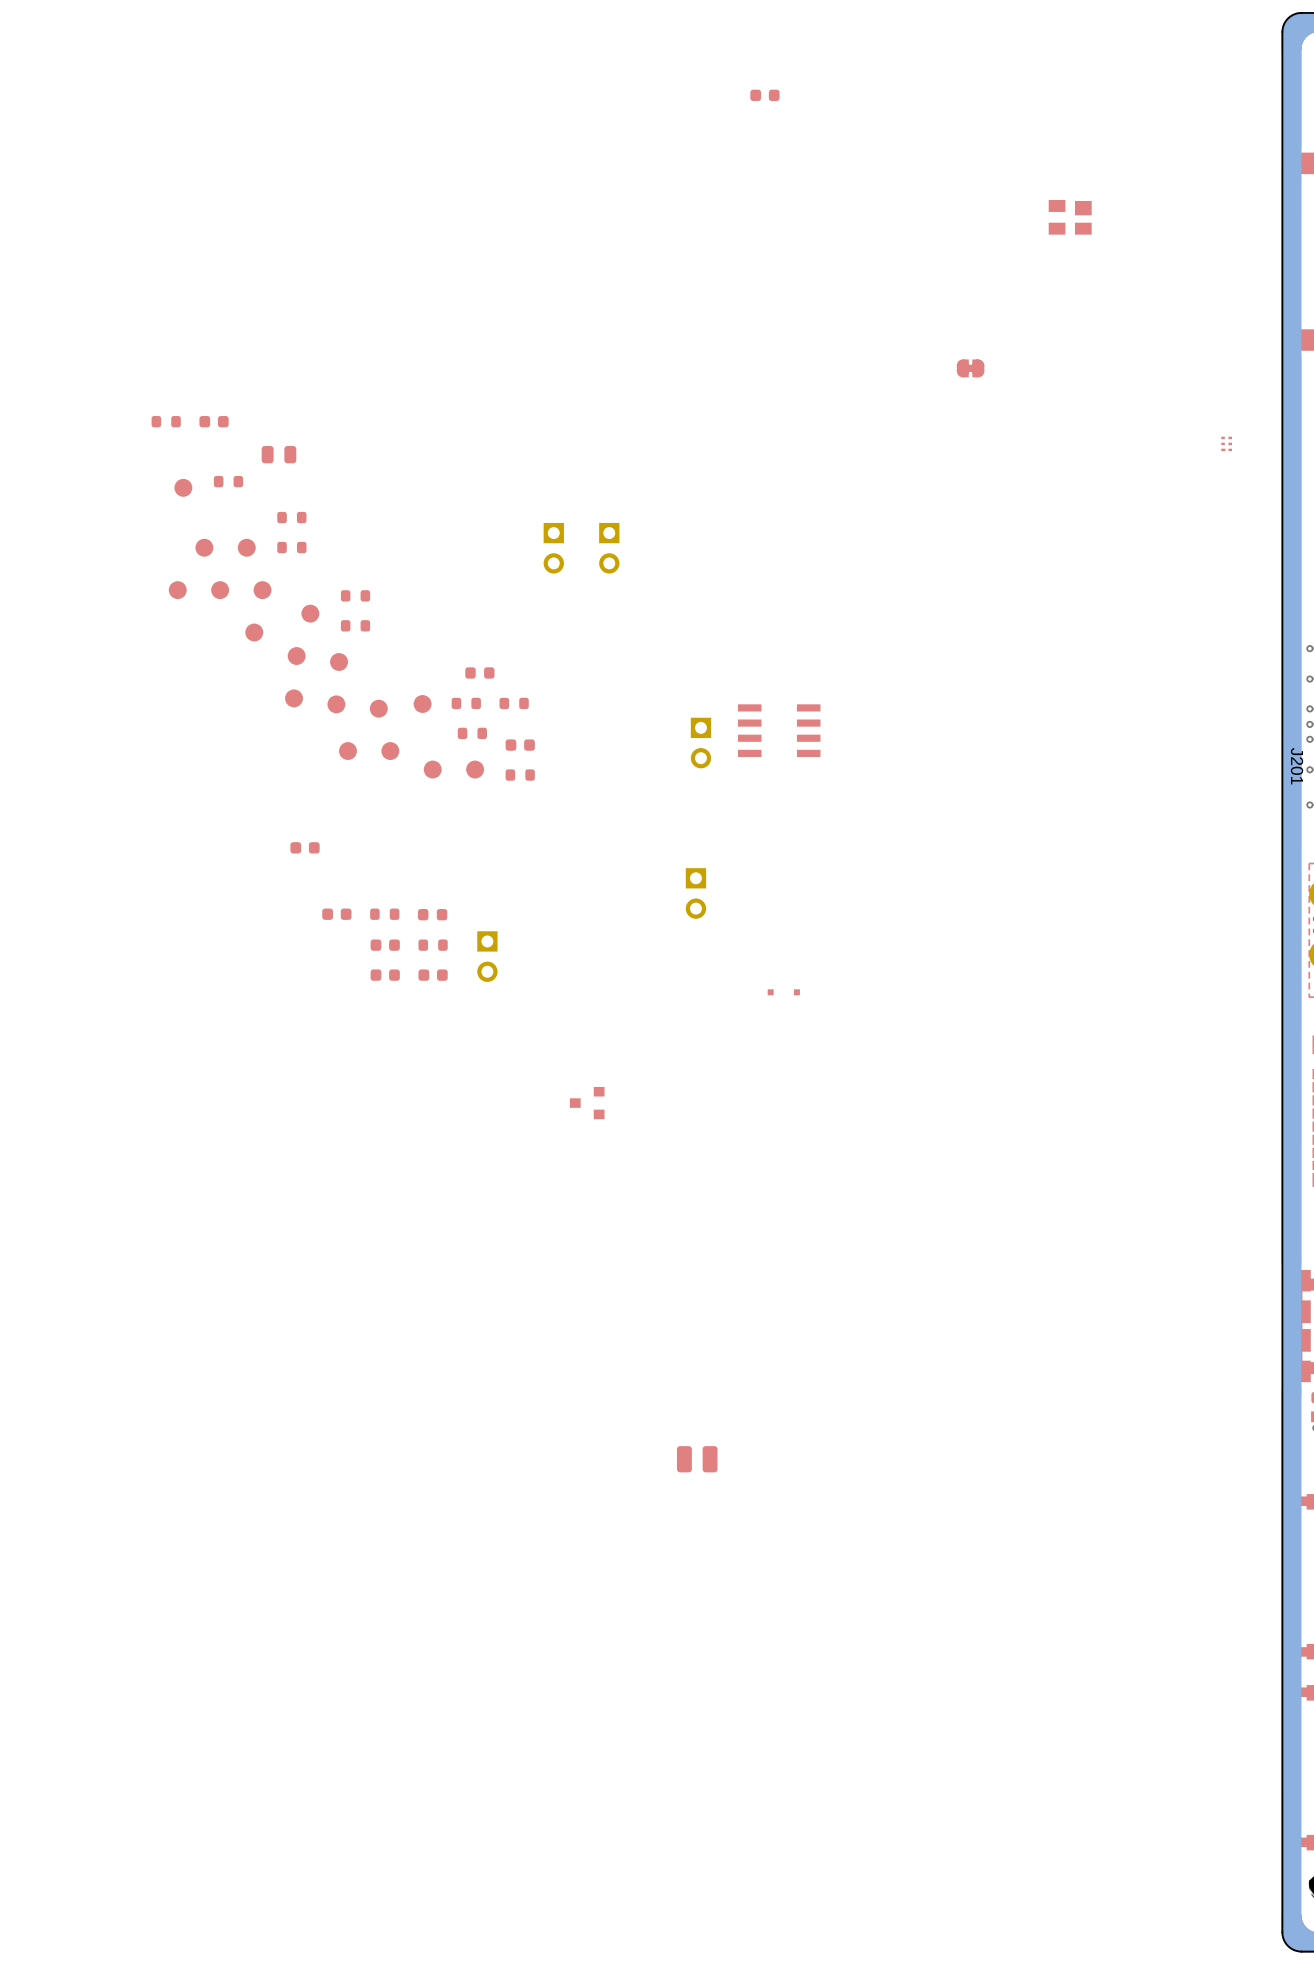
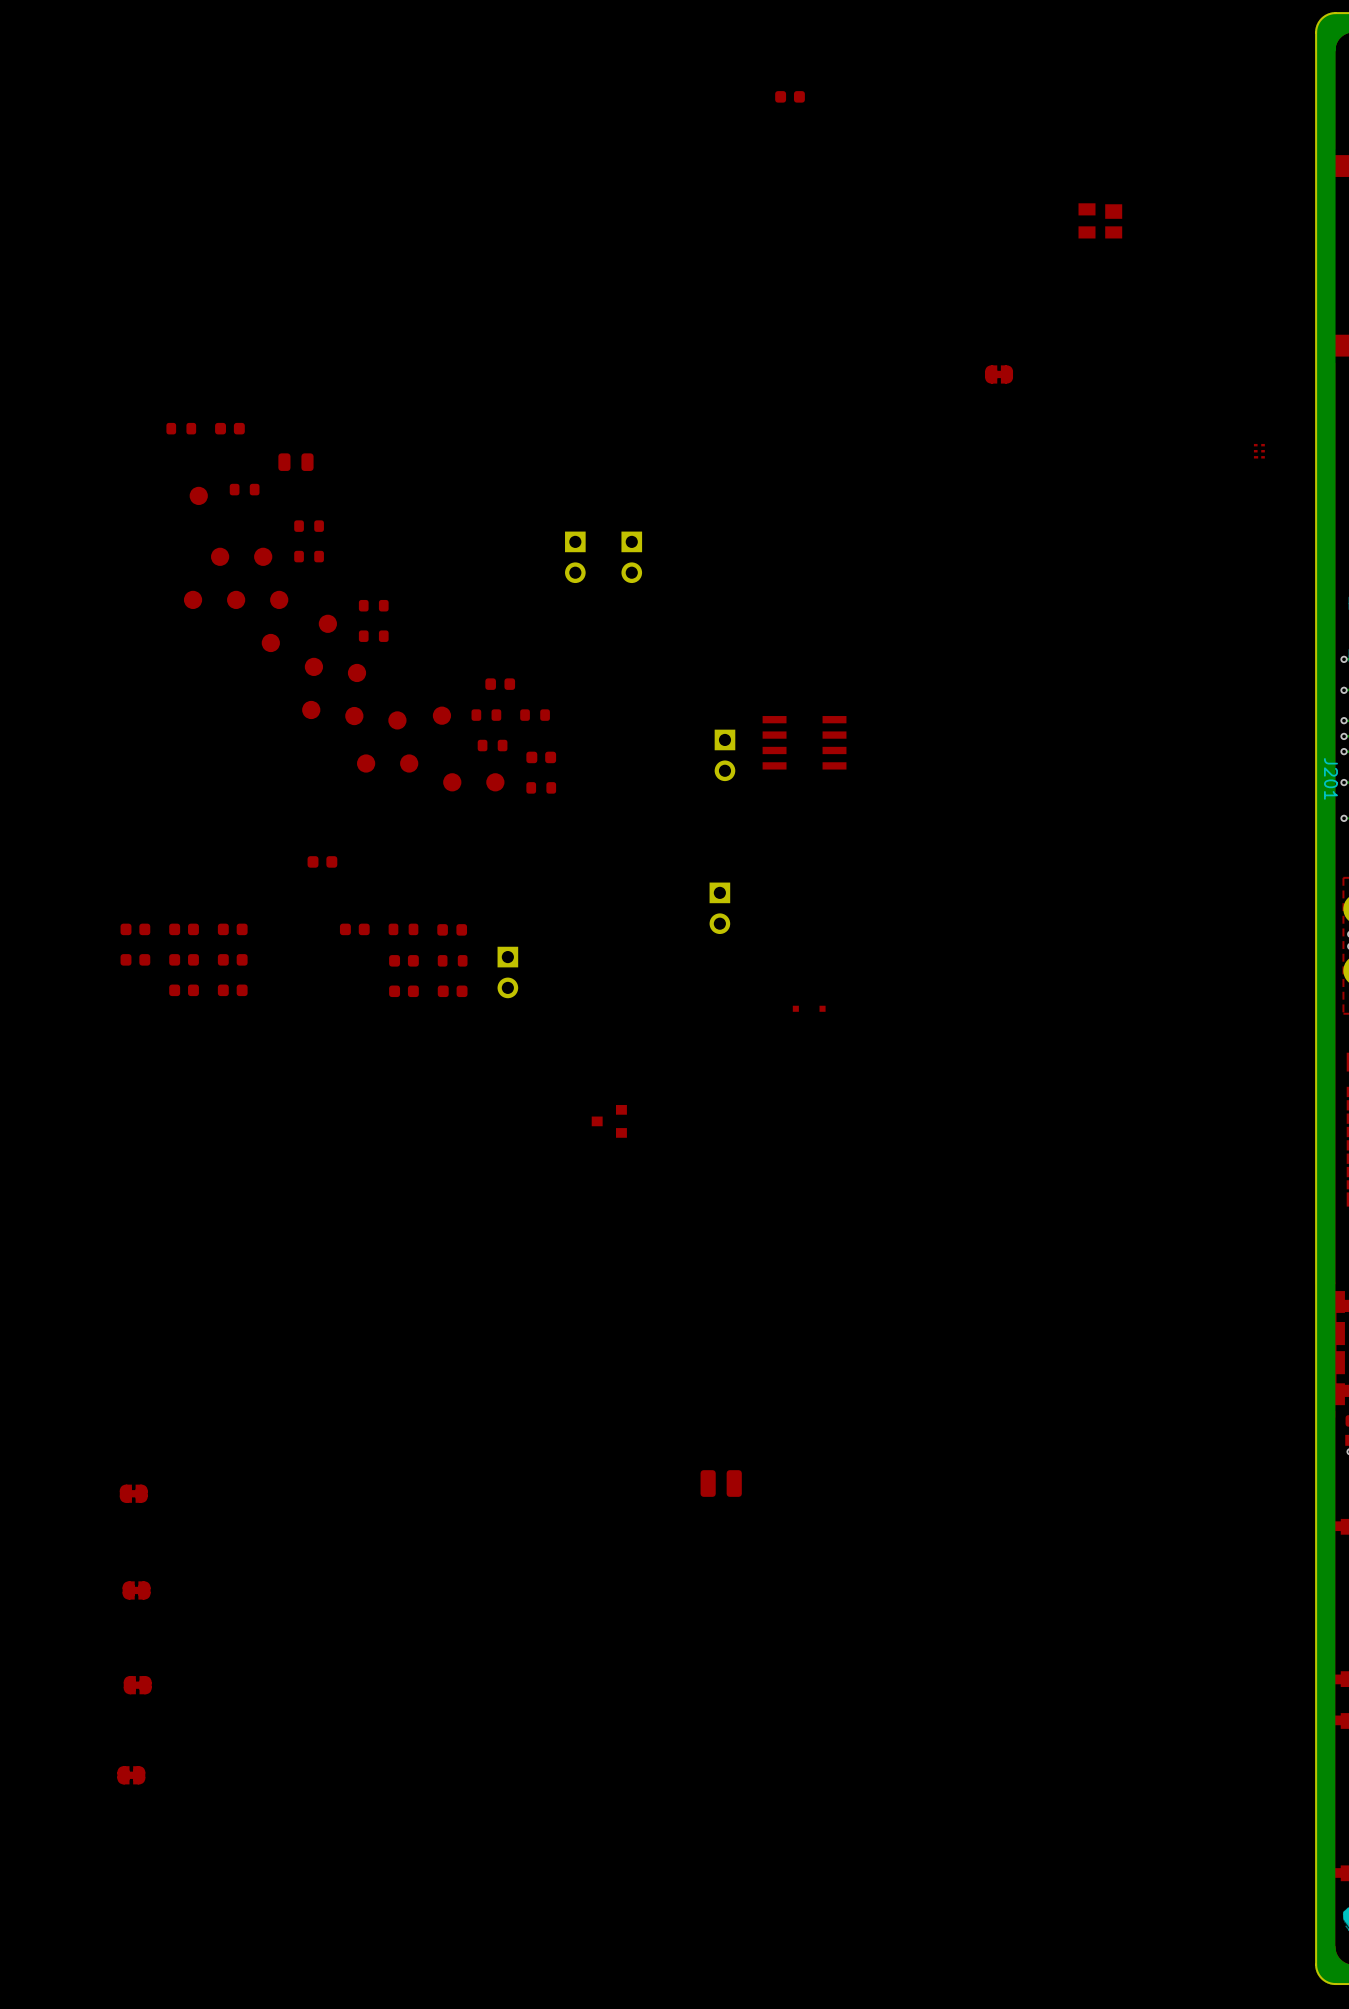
part: none -> (135, 929)
part: none -> (184, 929)
part: none -> (232, 929)
part: none -> (135, 959)
part: none -> (184, 959)
part: none -> (232, 959)
part: none -> (184, 990)
part: none -> (232, 990)
part: none -> (133, 1493)
part: none -> (136, 1590)
part: none -> (137, 1685)
part: none -> (131, 1775)

